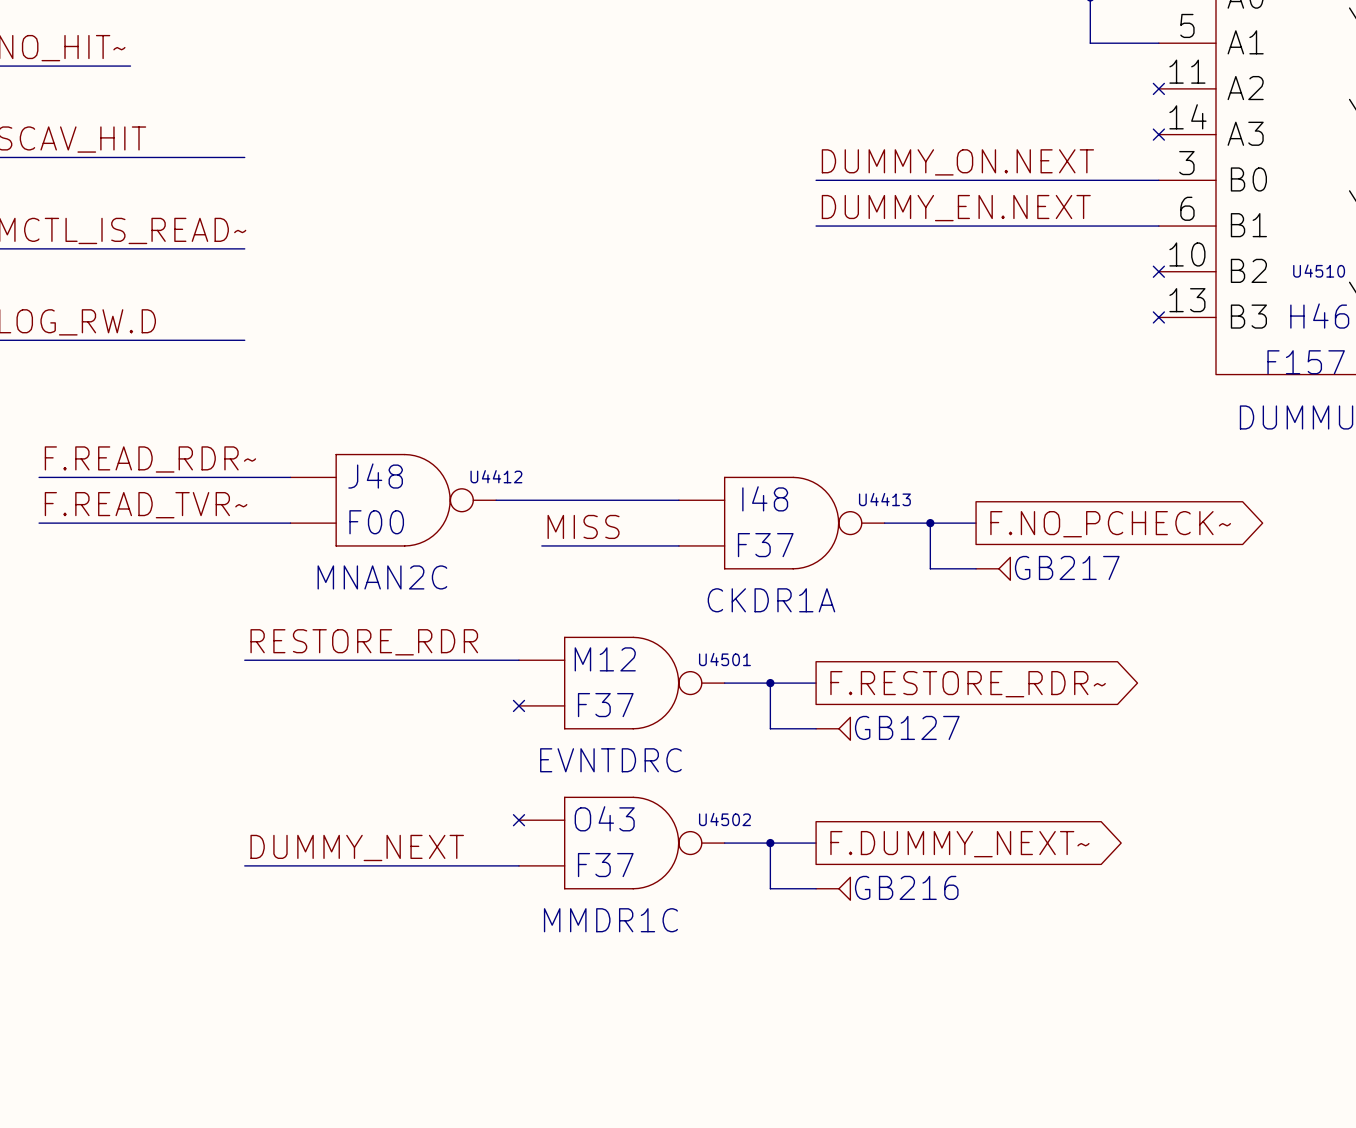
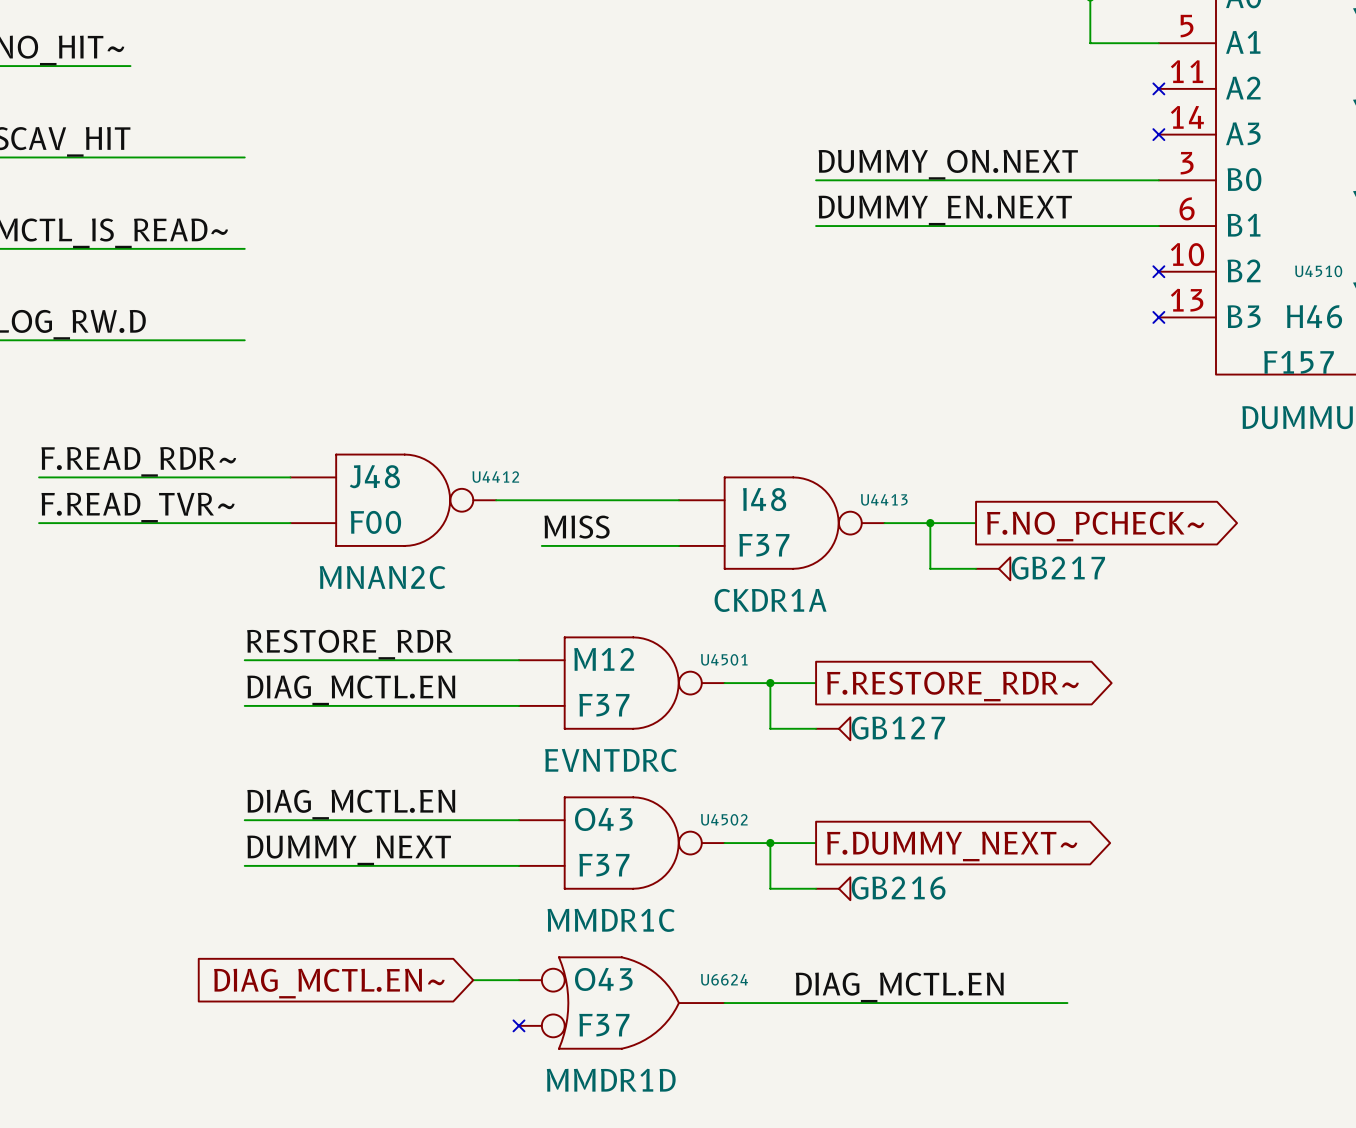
label: none -> DIAG_MCTL.EN (351, 690)
wire: none -> (244, 705) (518, 705)
no-connect mark: (518, 705) -> none
label: none -> DIAG_MCTL.EN (351, 804)
wire: none -> (244, 820) (518, 820)
no-connect mark: (518, 820) -> none
wire: none -> (473, 980) (518, 980)
global label: none -> DIAG_MCTL.EN~ (329, 983)
label: none -> DIAG_MCTL.EN (899, 987)
U6624: none -> F37 (621, 1003)
wire: none -> (724, 1003) (1067, 1003)
no-connect mark: none -> (518, 1025)

